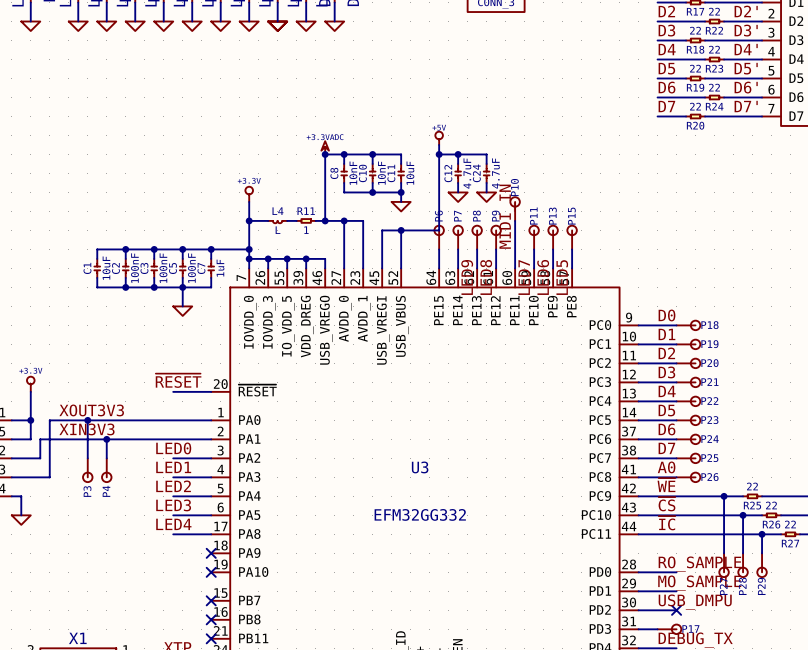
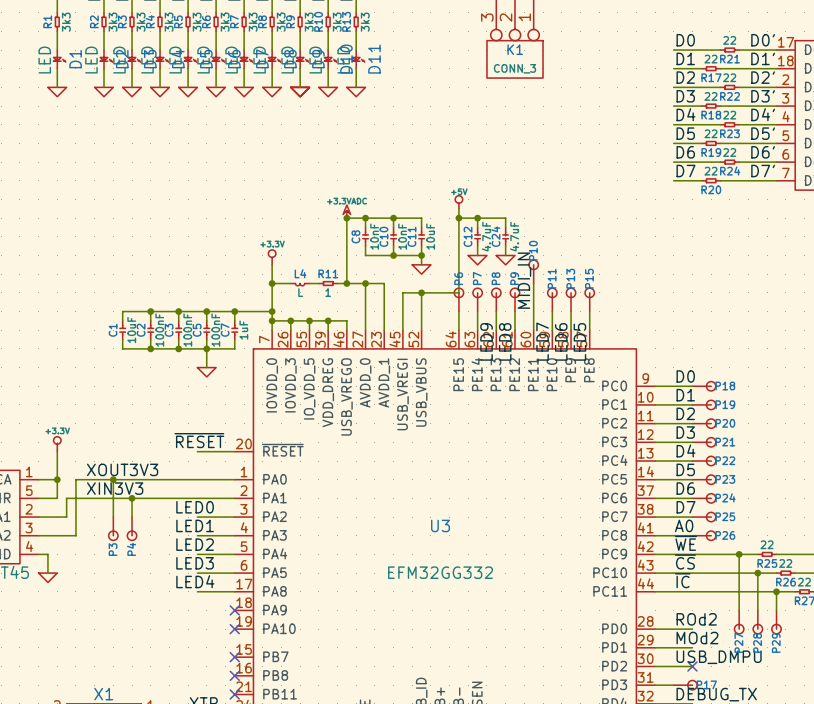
label: RO_SAMPLE (699, 564) -> ROd2 (696, 619)
label: MO_SAMPLE (699, 583) -> MOd2 (697, 638)

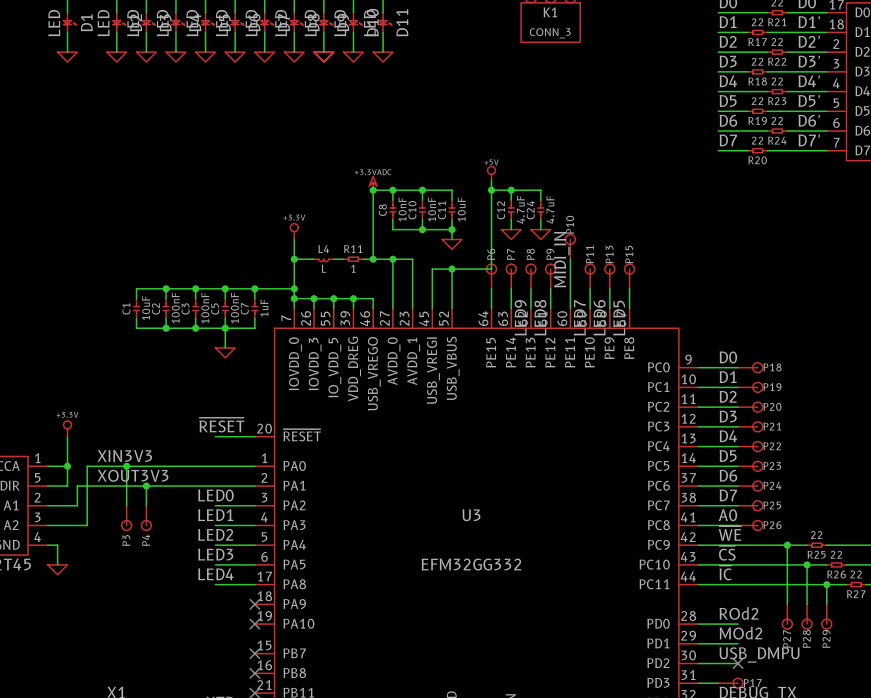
label: XOUT3V3 (122, 469) -> XIN3V3 (124, 456)
label: XIN3V3 (115, 488) -> XOUT3V3 (132, 475)

